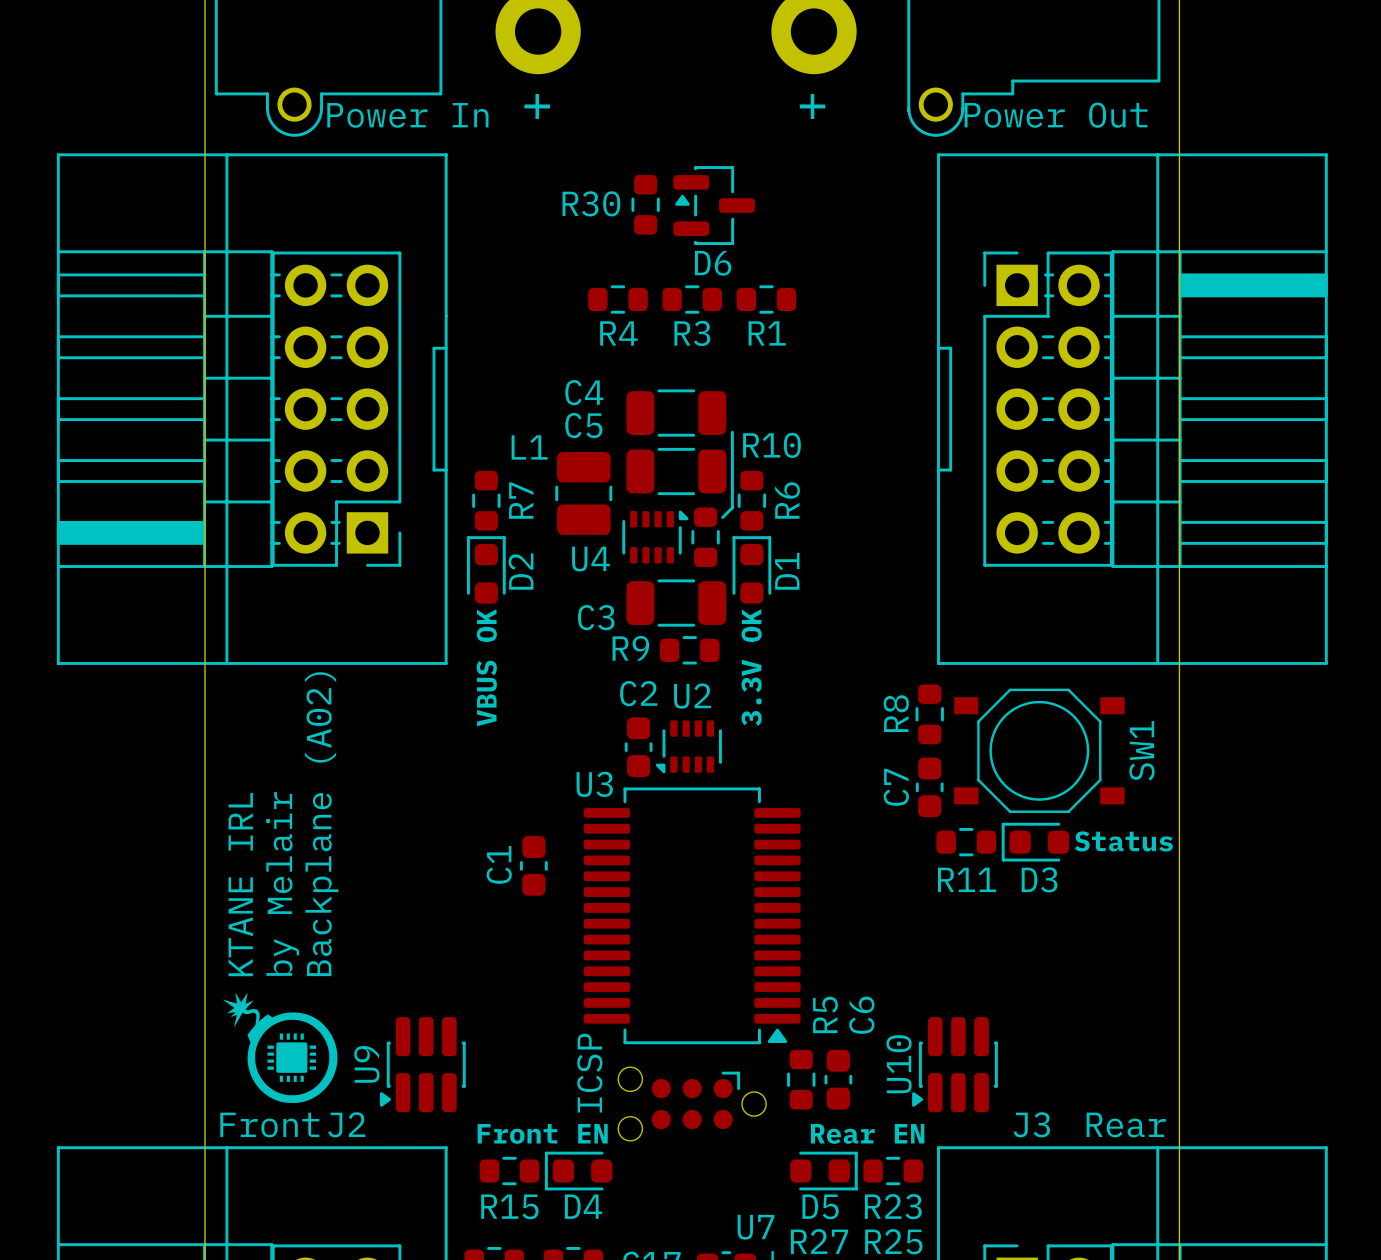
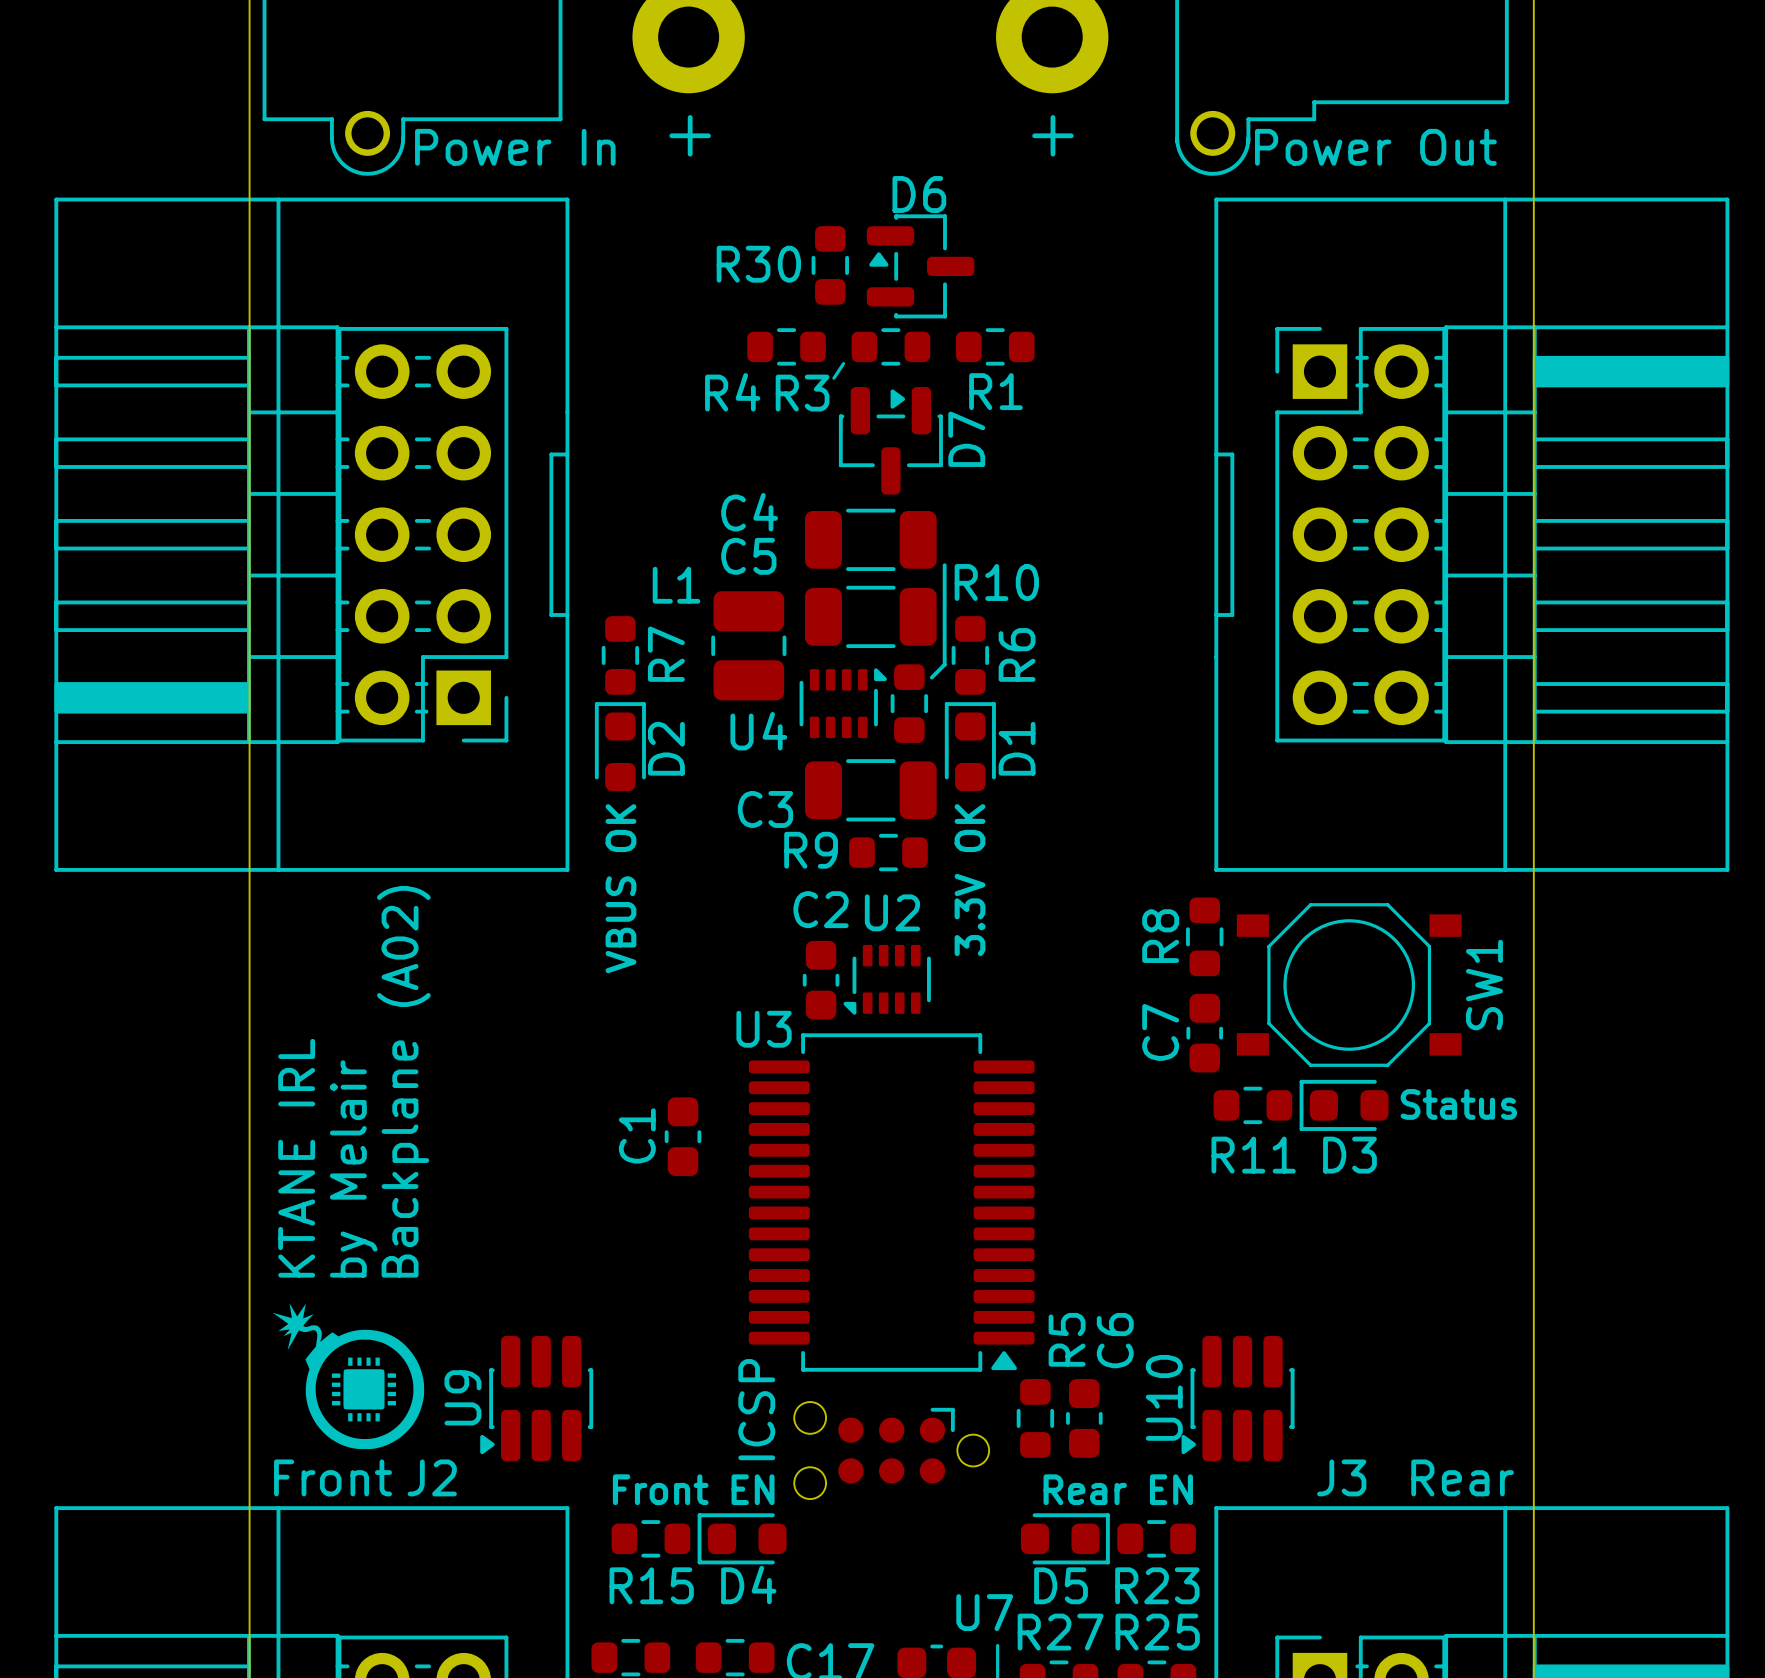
D6 name position: D6 (713, 263) -> D6 (919, 194)
line: none -> (843, 363) (833, 378)
R4 position: (617, 299) -> (786, 346)
R3 position: (692, 299) -> (890, 346)
R1 position: (766, 299) -> (995, 346)
R4 name position: R4 (618, 333) -> R4 (732, 392)
R3 name position: R3 (692, 333) -> R3 (802, 393)
D7: none -> (890, 440)

